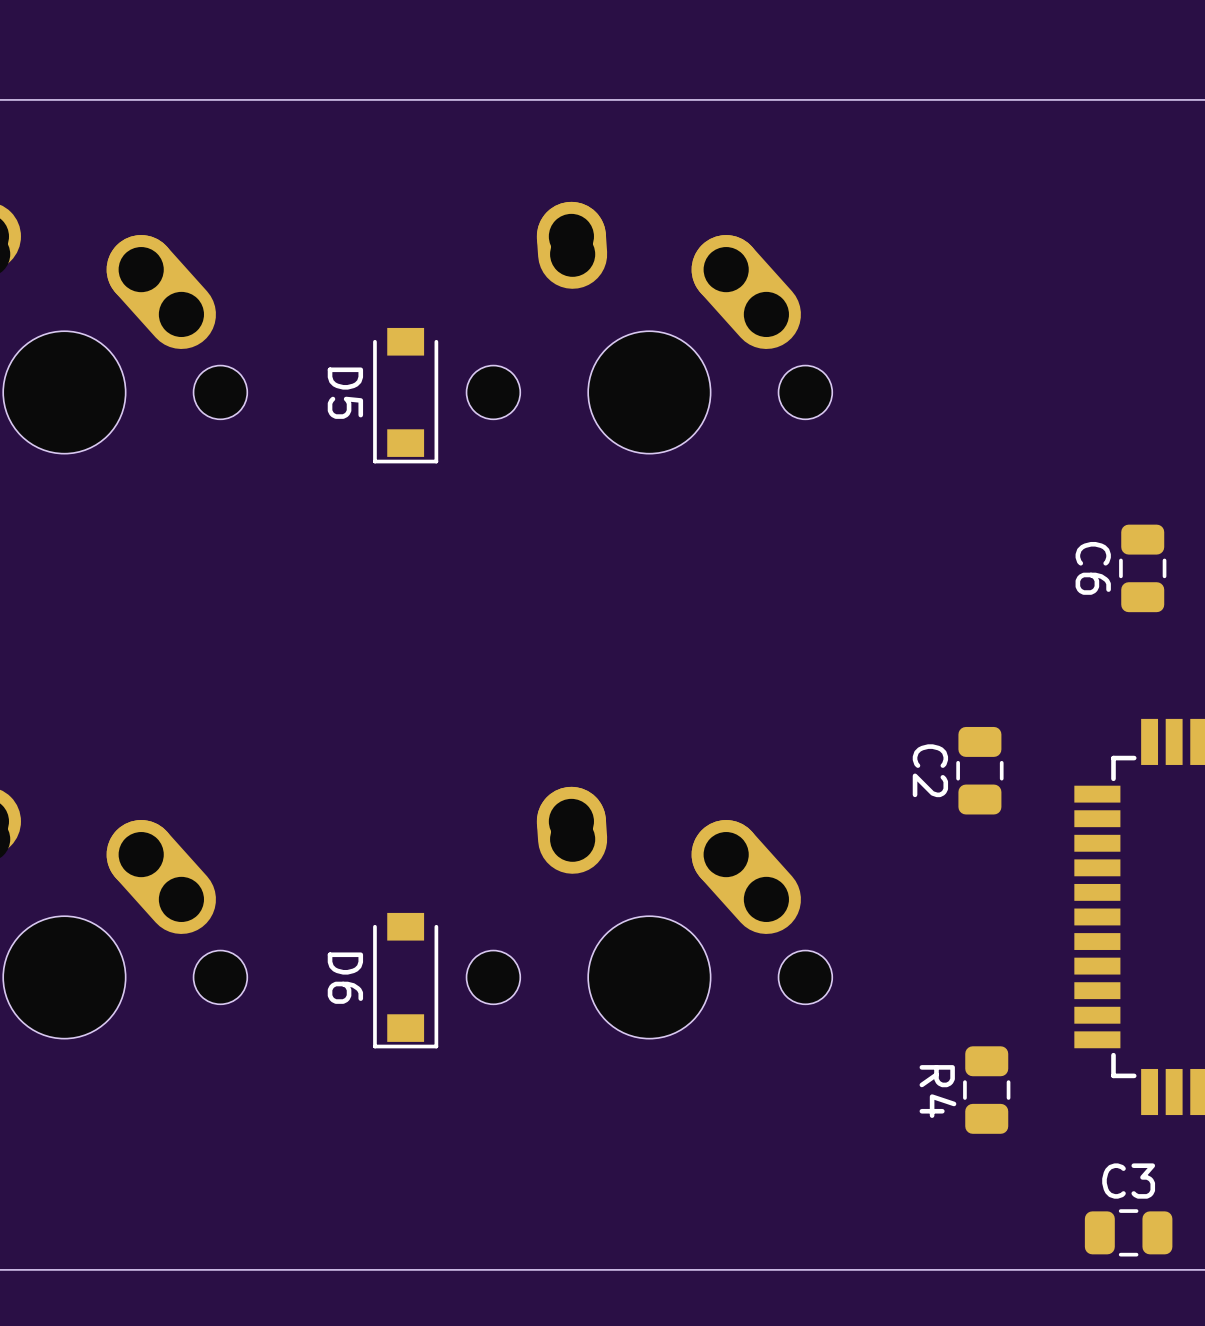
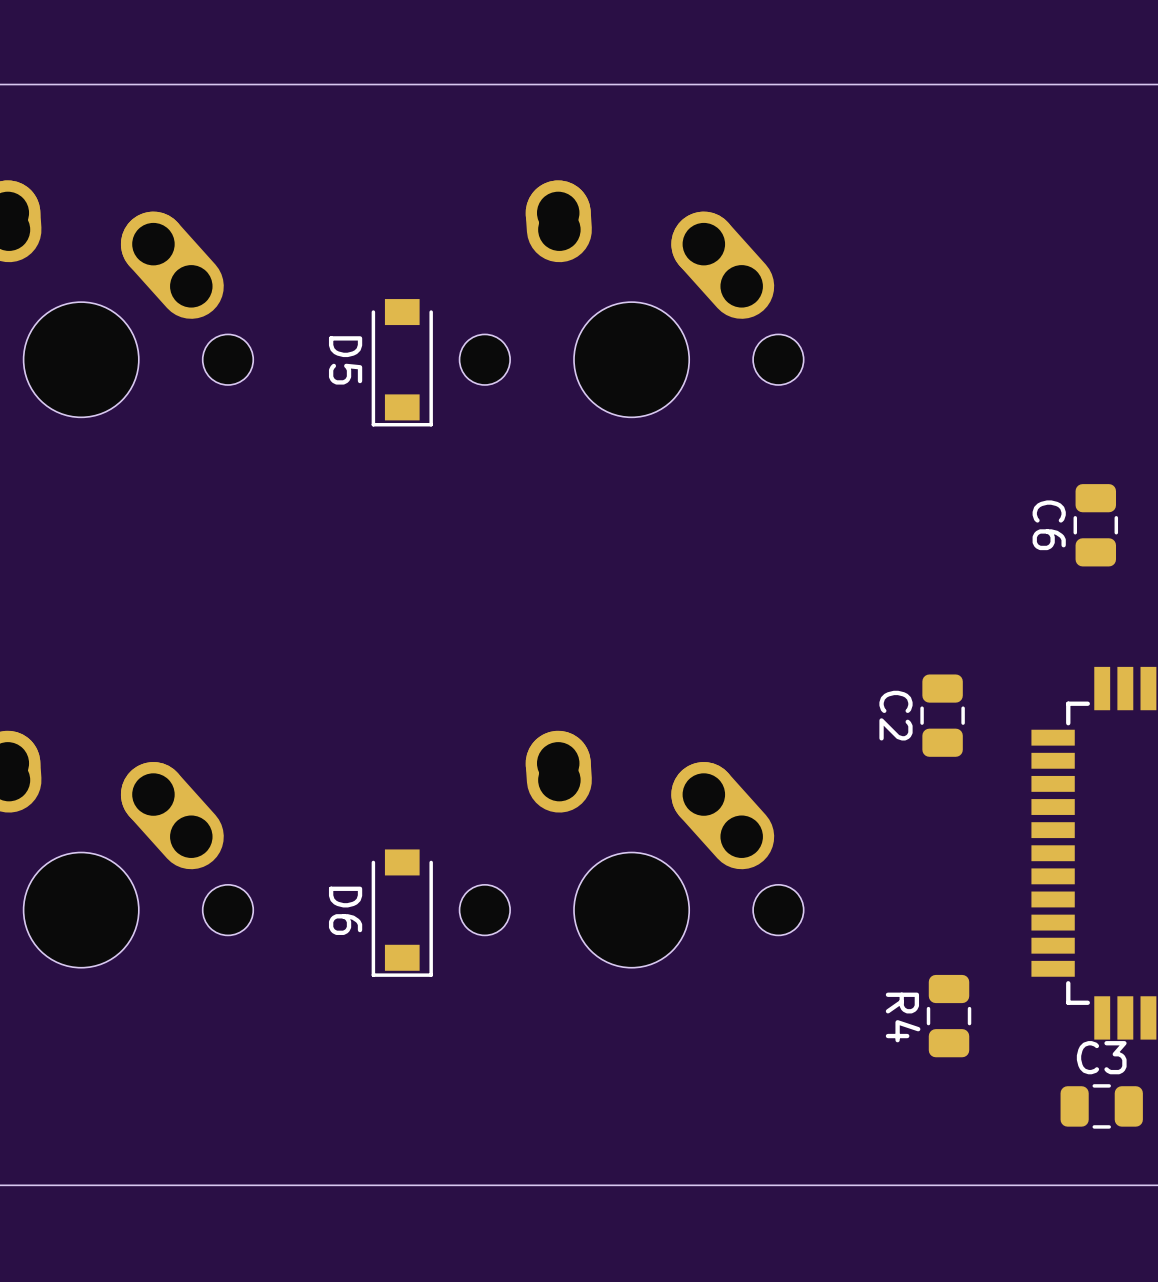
C3 position: (1128, 1232) -> (1101, 1106)

